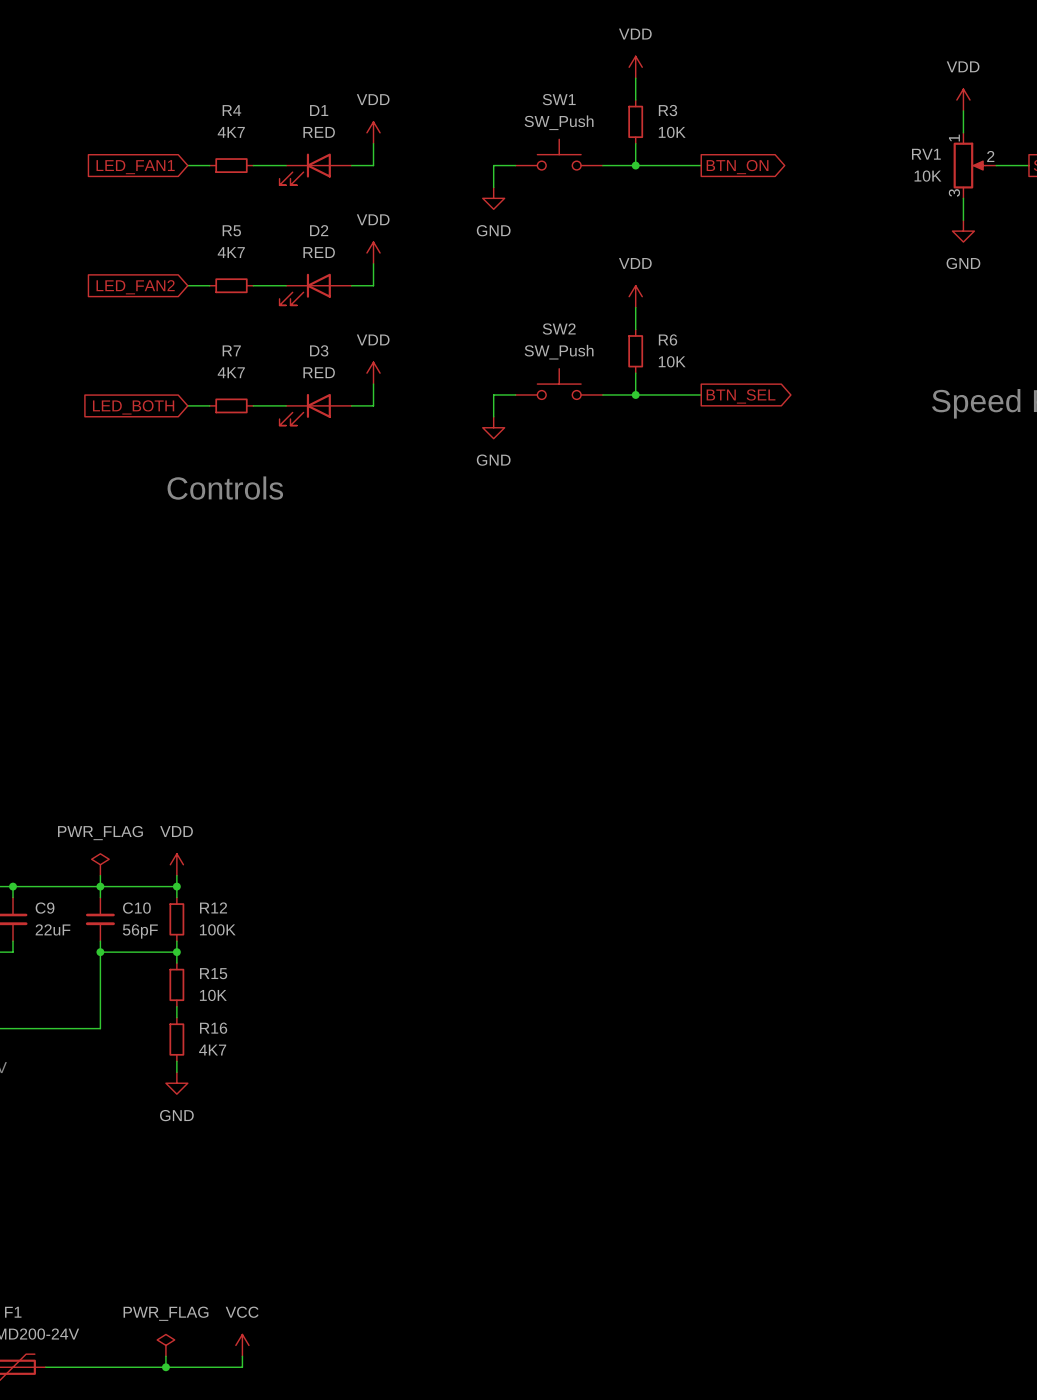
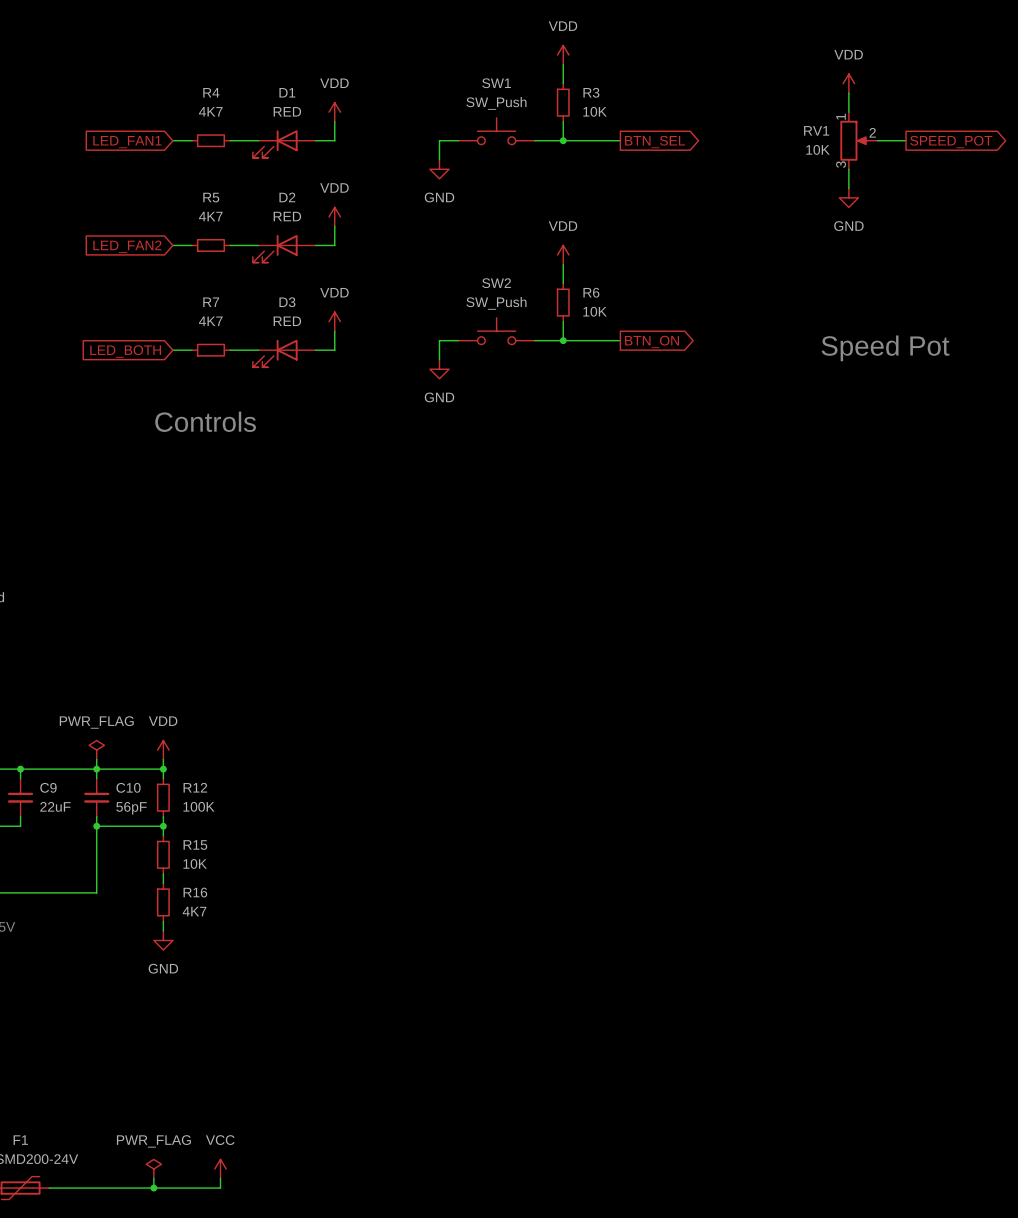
global label: BTN_ON (737, 167) -> BTN_SEL (655, 142)
global label: BTN_SEL (741, 396) -> BTN_ON (652, 341)

